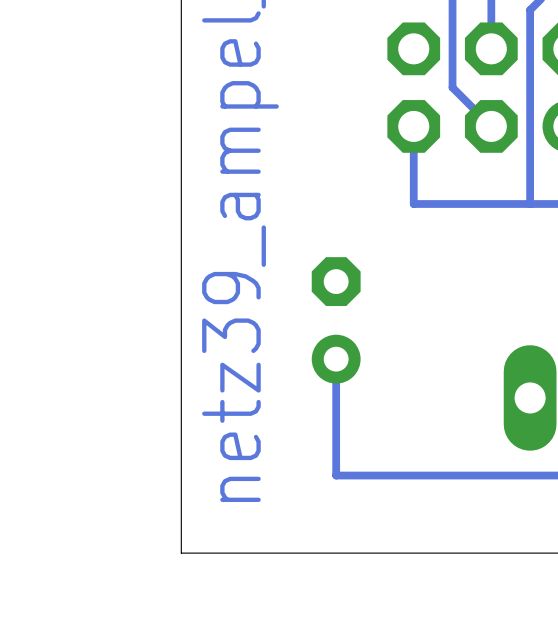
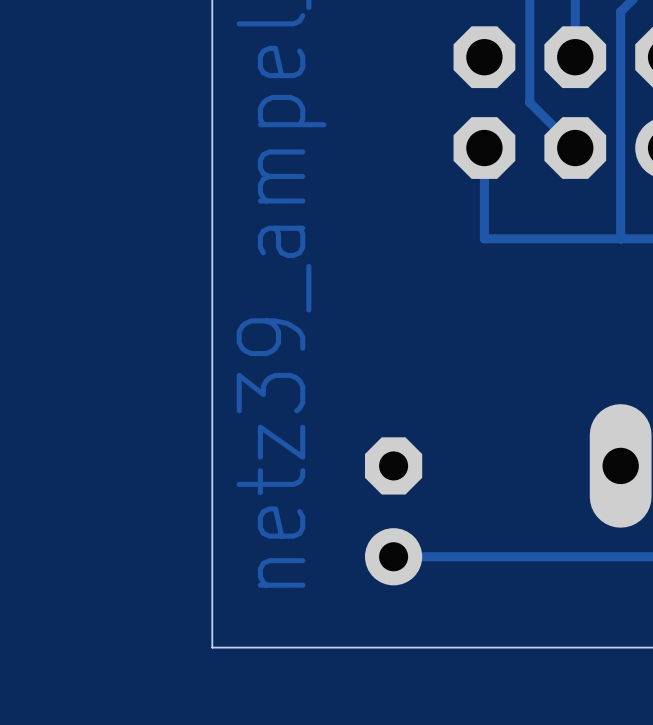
part position: (336, 320) -> (393, 511)
track: (336, 359) (336, 475) -> none

